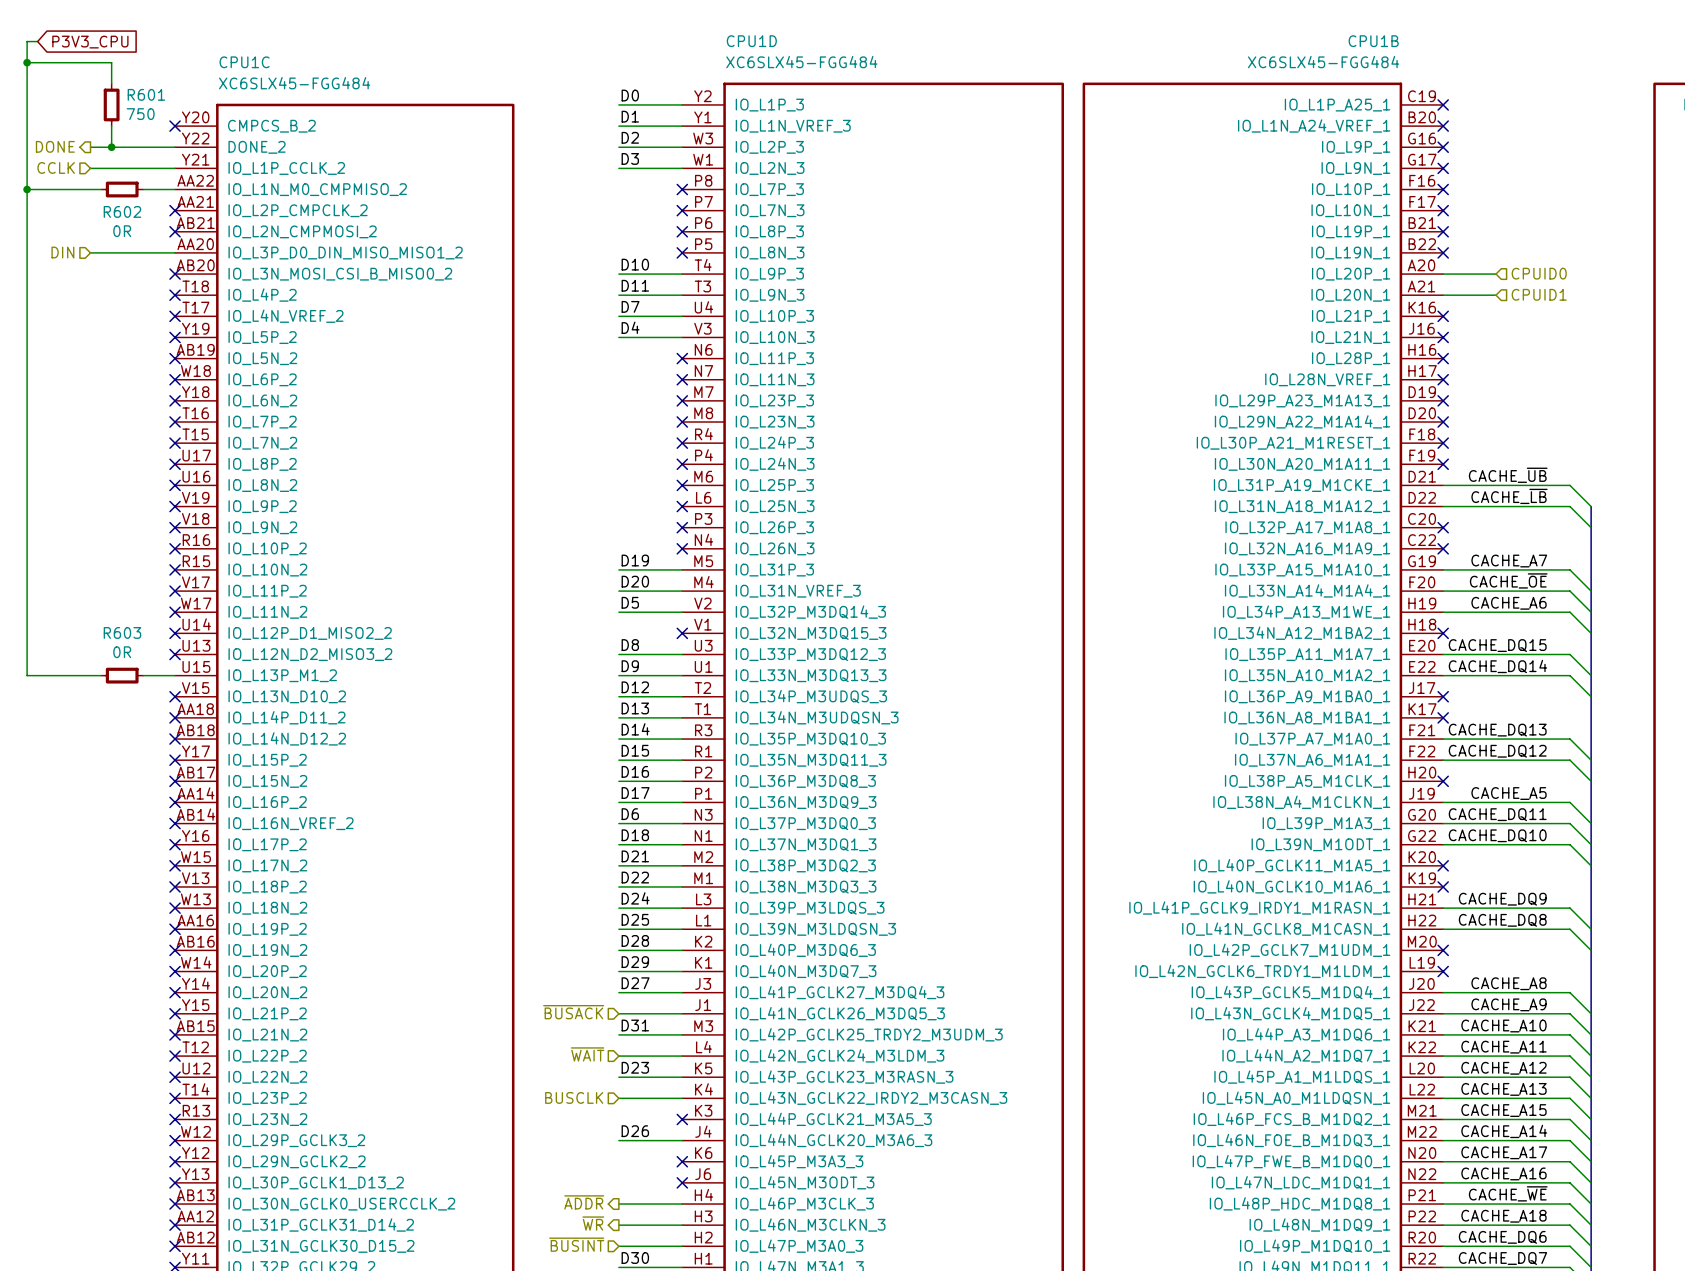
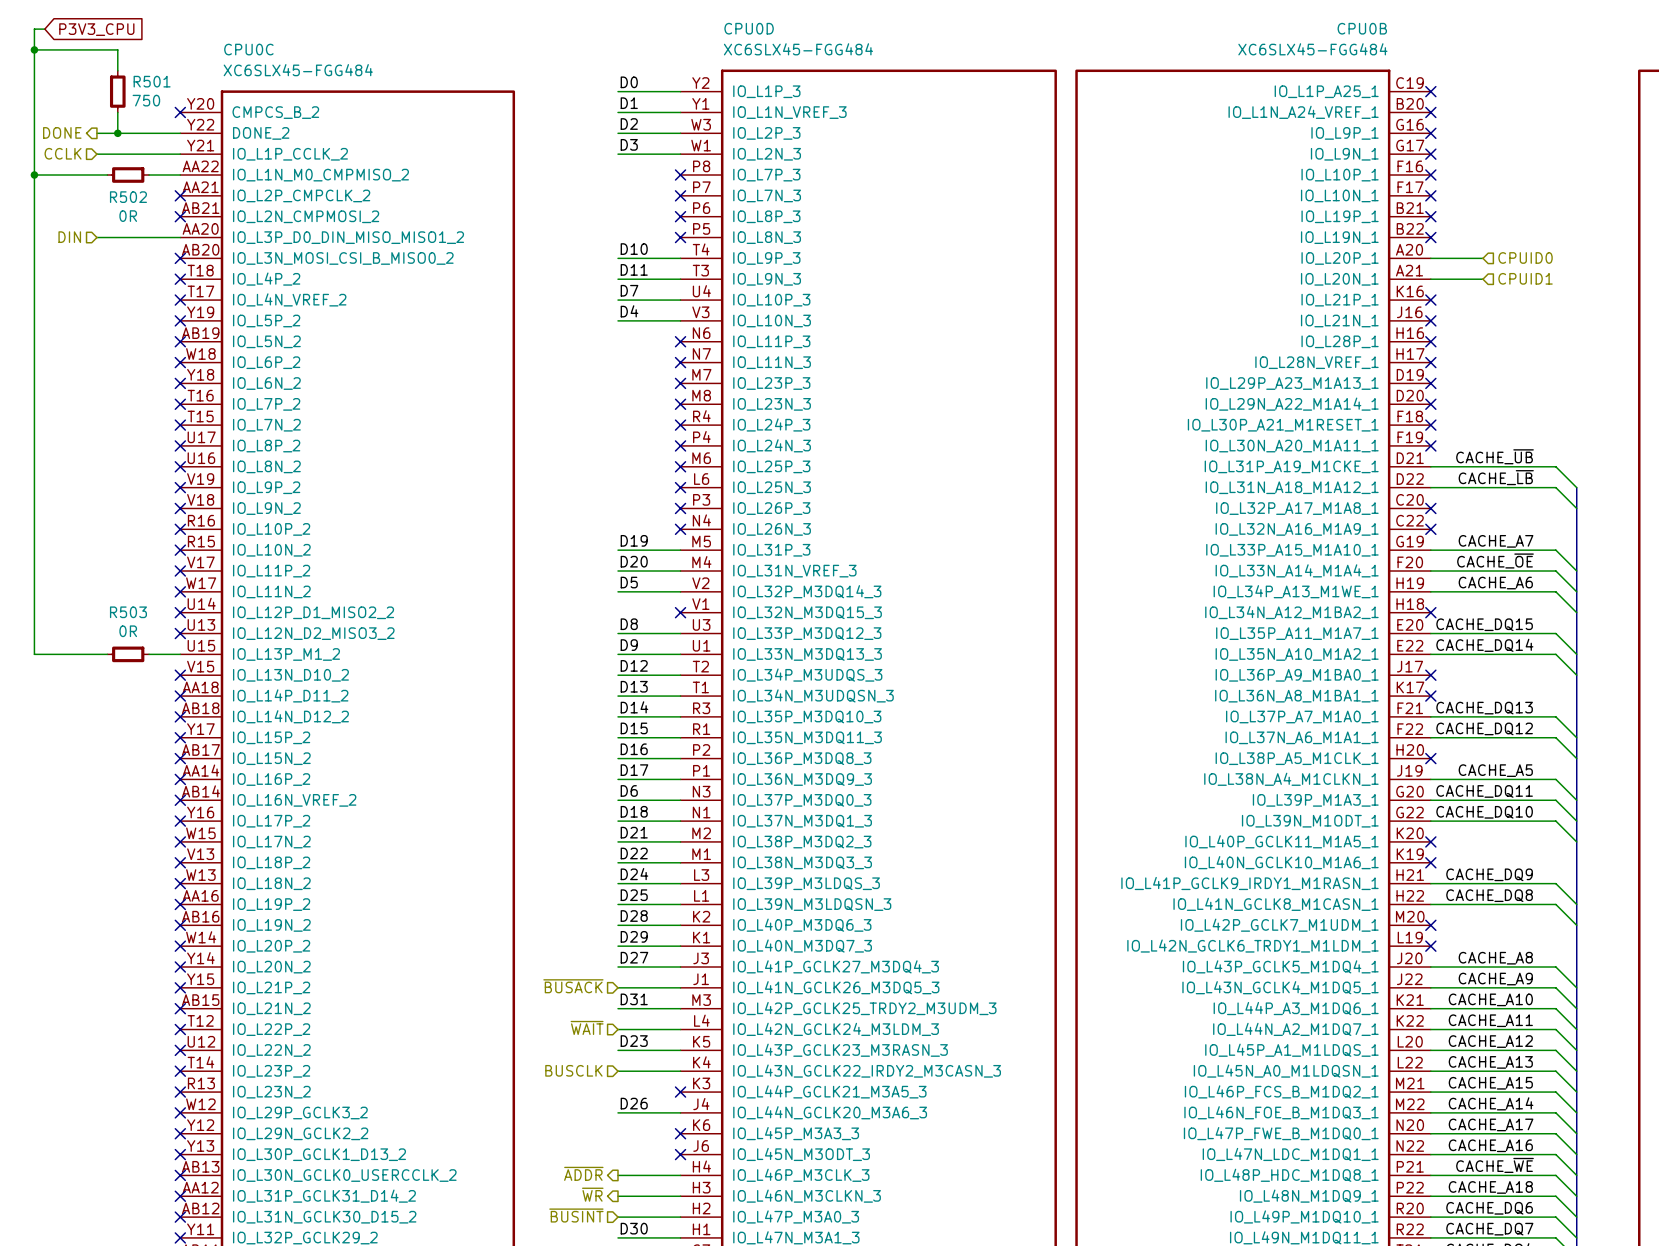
CPU1D name: CPU1D (751, 41) -> CPU0D (749, 28)
CPU1B name: CPU1B (1373, 41) -> CPU0B (1362, 28)
CPU1C name: CPU1C (244, 62) -> CPU0C (248, 49)
R601 name: R601 (146, 94) -> R501 (152, 81)
R602 name: R602 (122, 211) -> R502 (128, 197)
R603 name: R603 (122, 632) -> R503 (128, 612)

